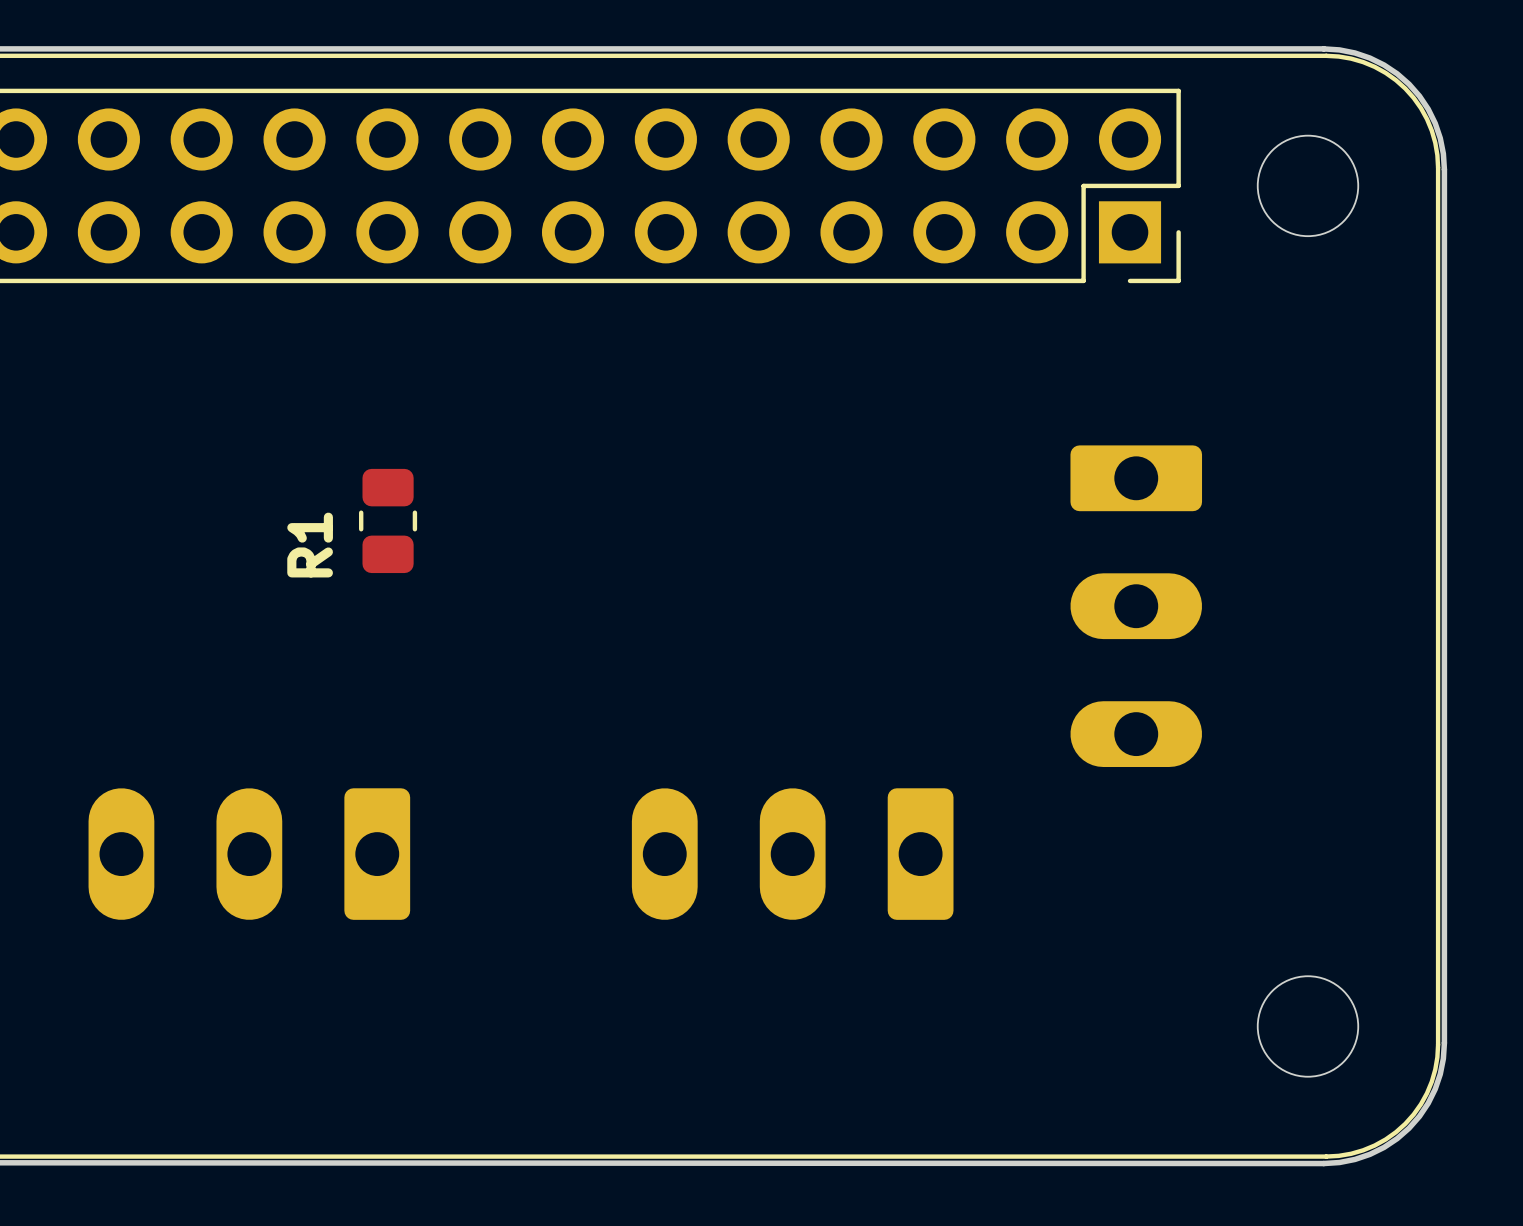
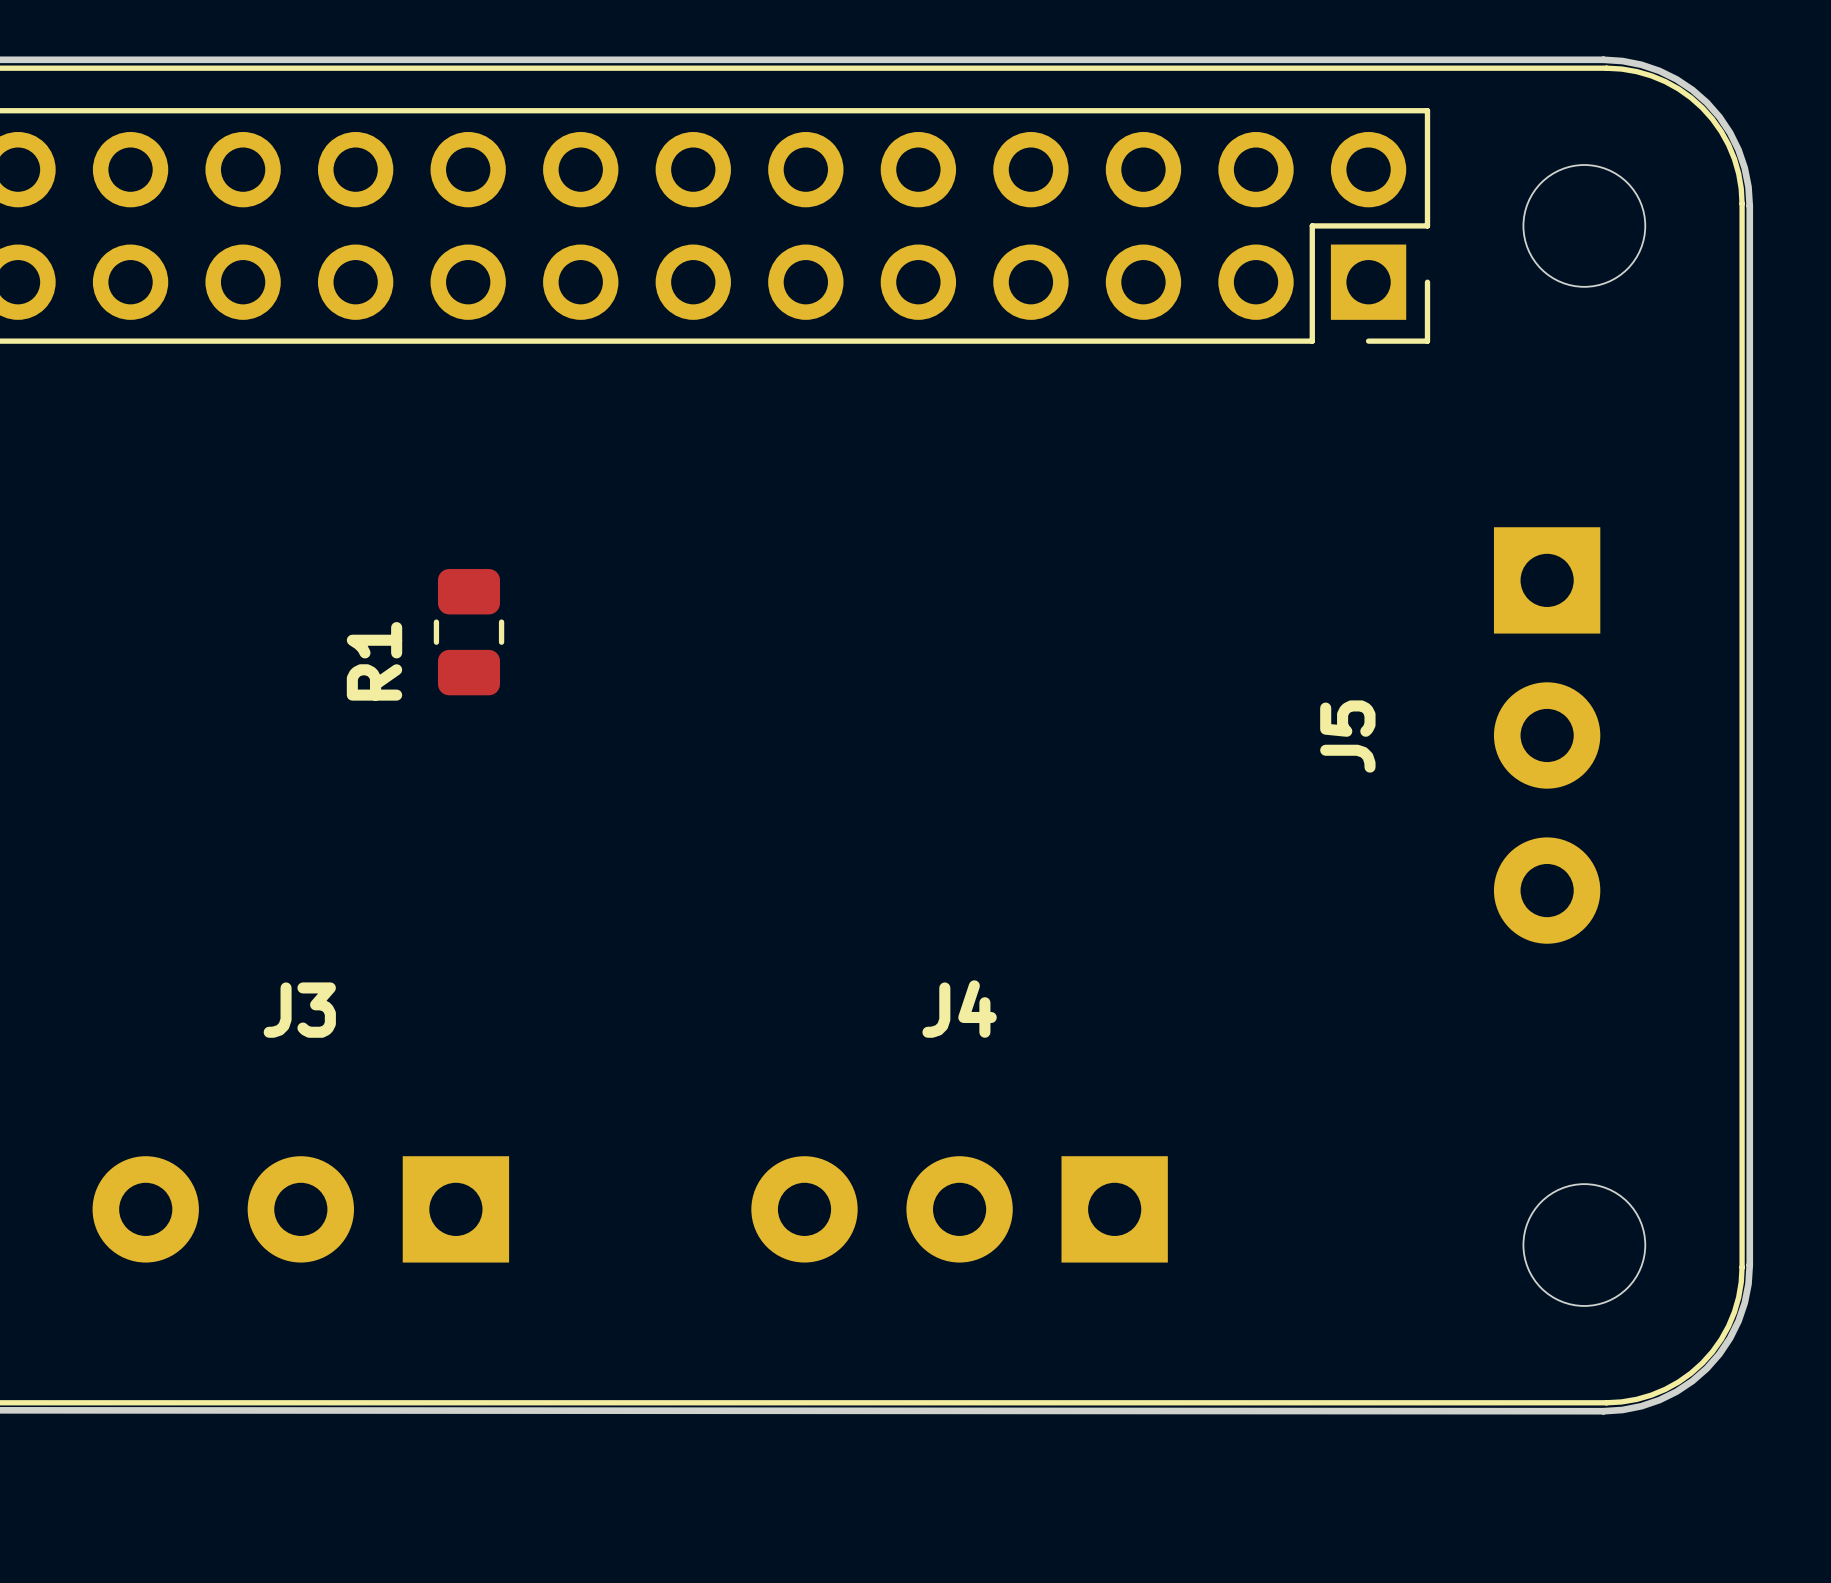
part: (1136, 606) -> none
J5: none -> (1547, 735)
part: (249, 854) -> none
part: (792, 854) -> none
J3: none -> (300, 1209)
J4: none -> (959, 1209)

